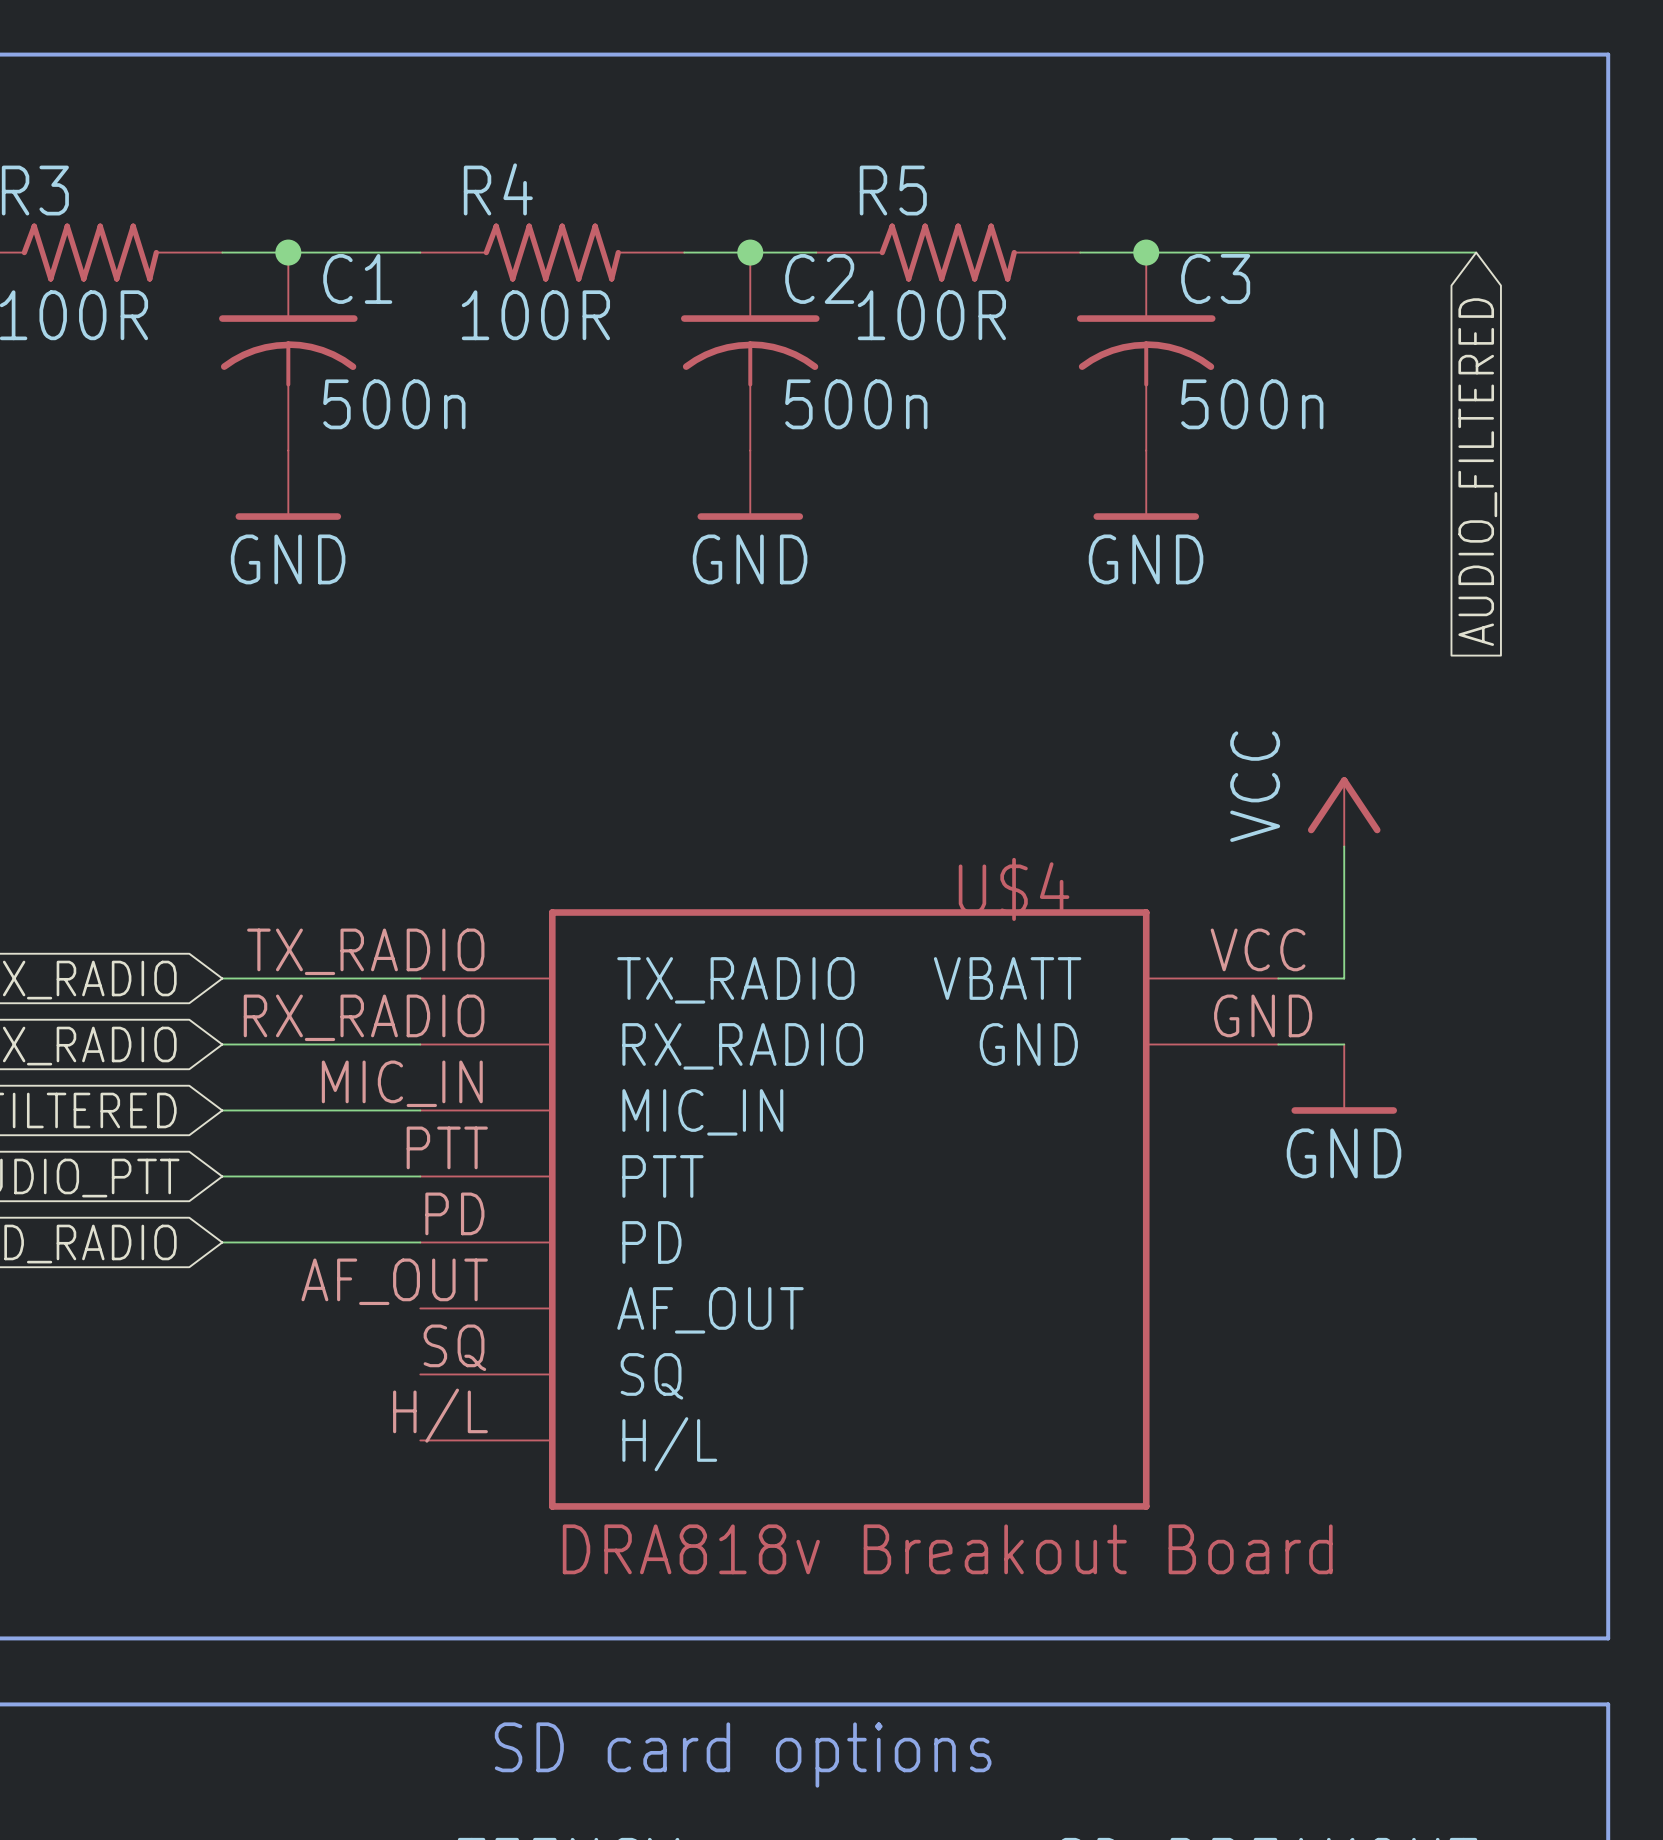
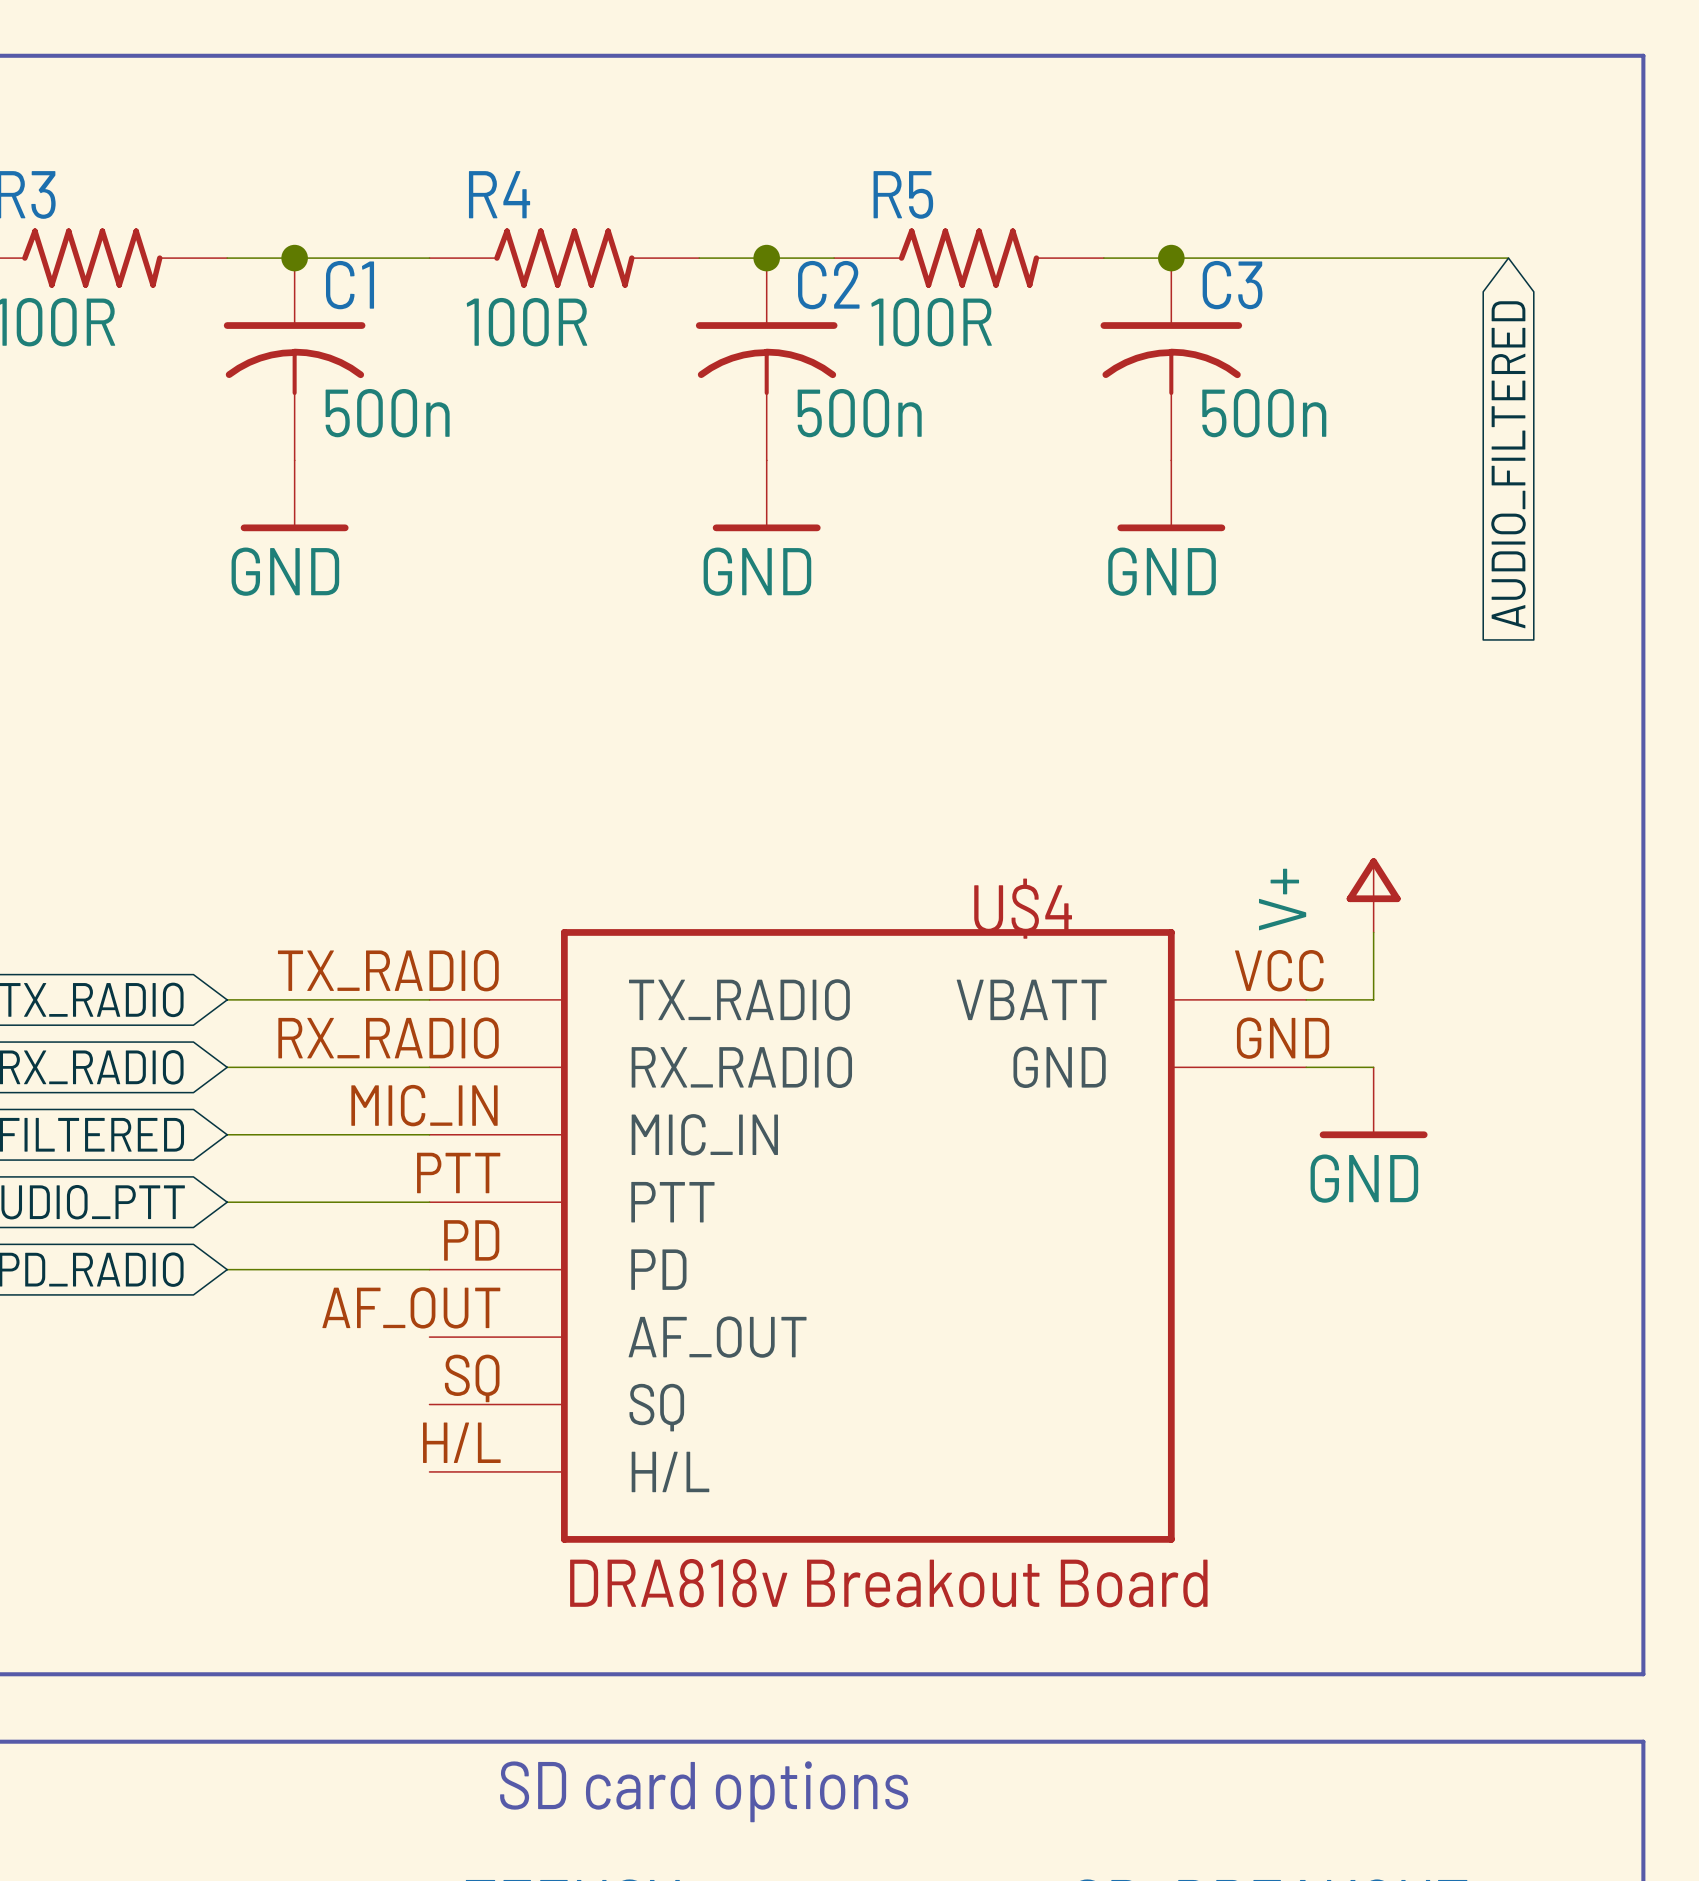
power symbol: VCC (1344, 811) -> none
power symbol: none -> V+ (1373, 895)

